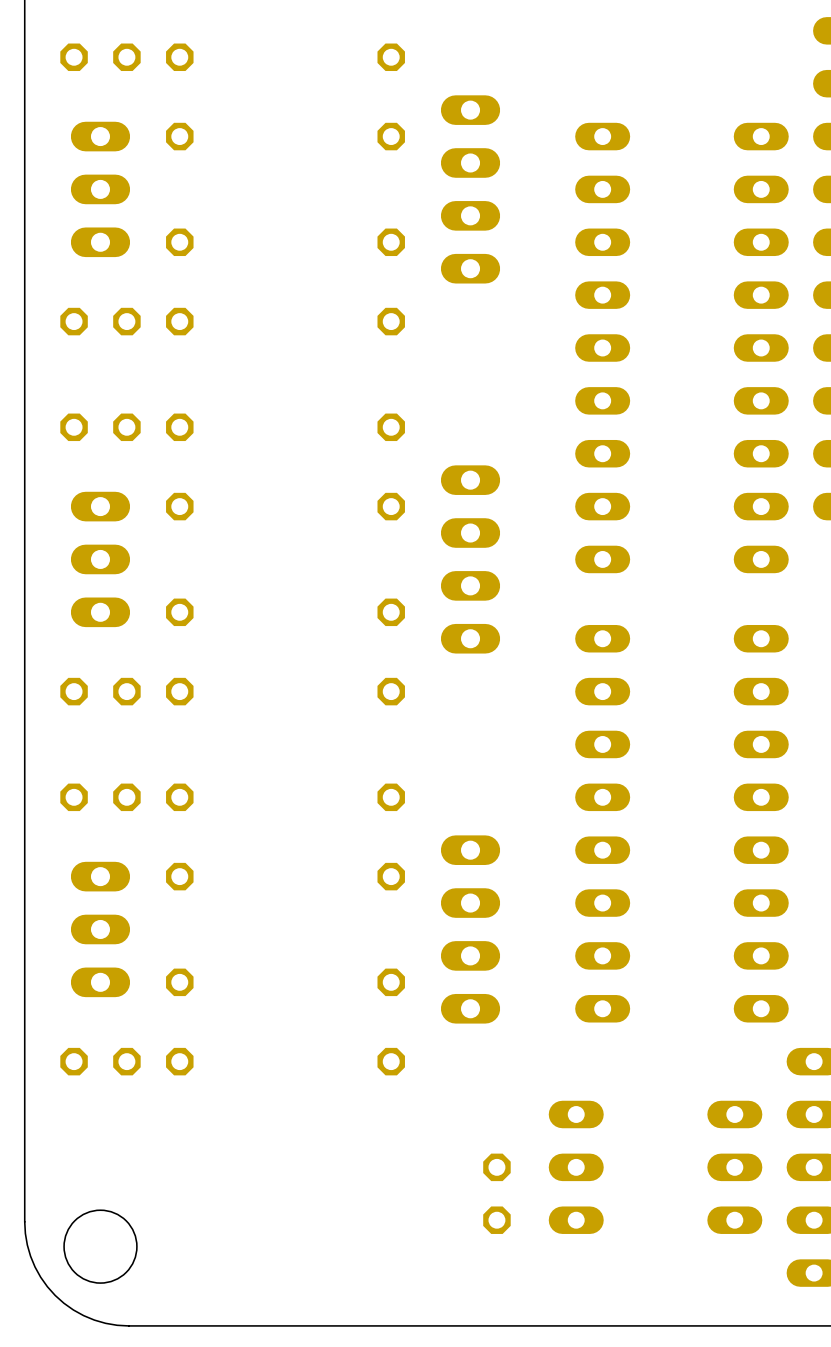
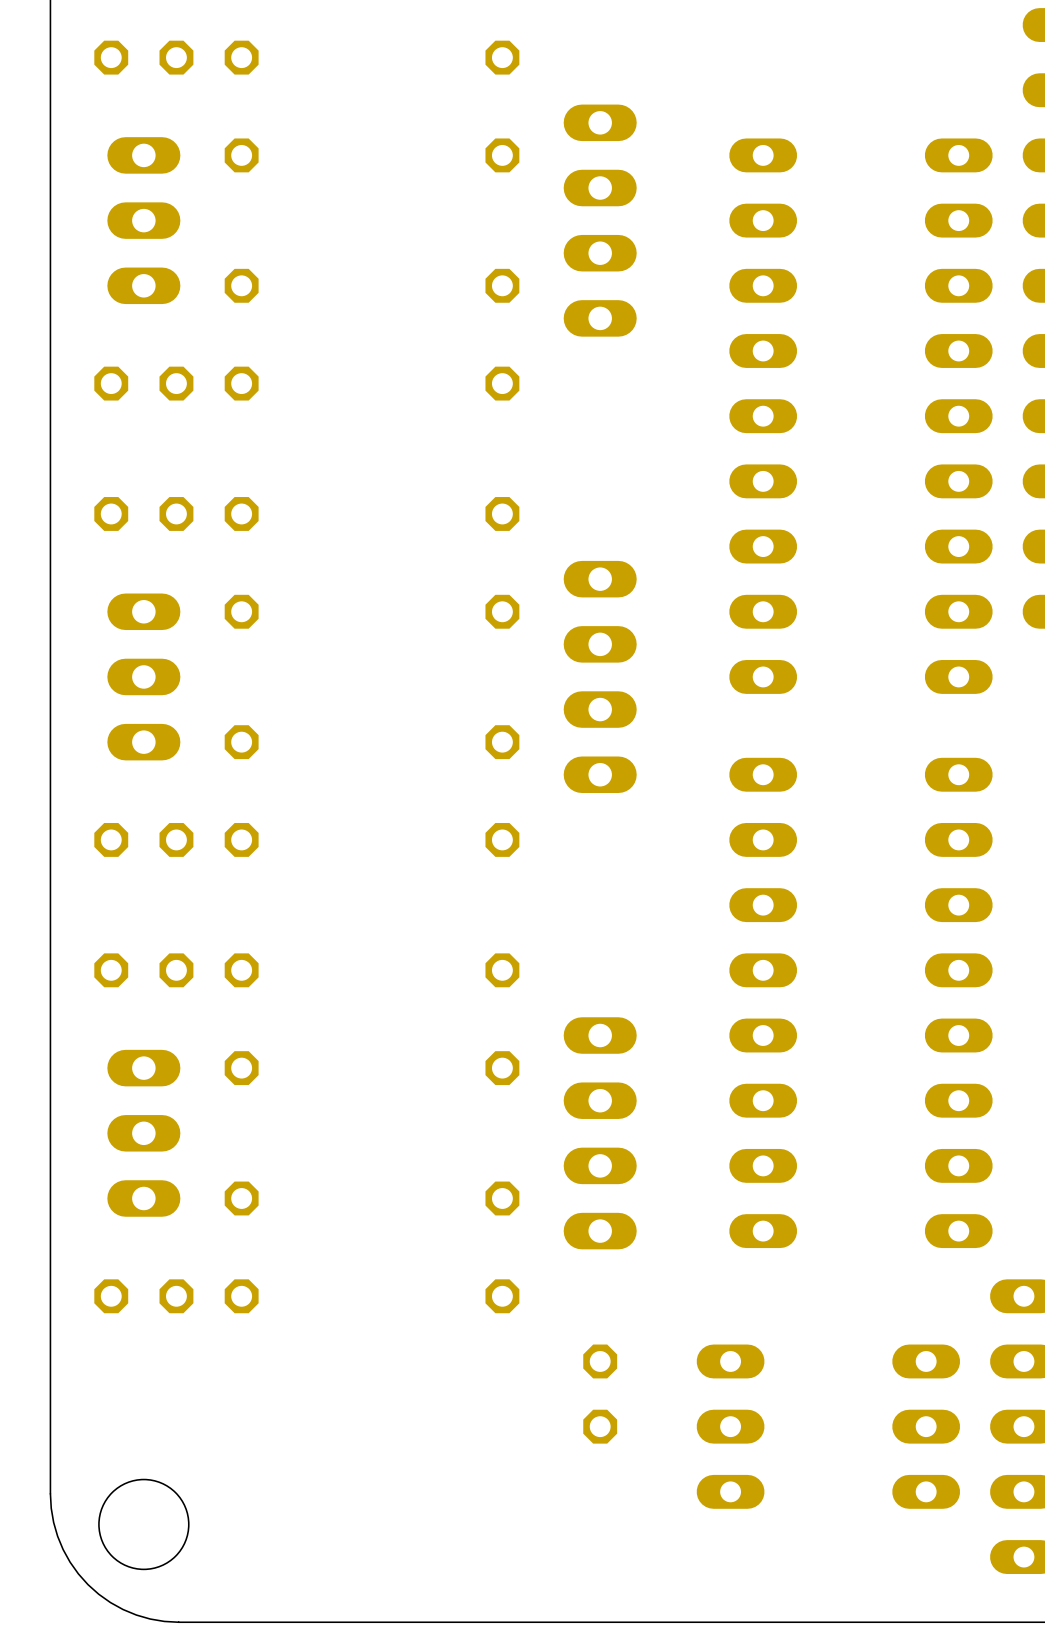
part position: (496, 1193) -> (600, 1394)

